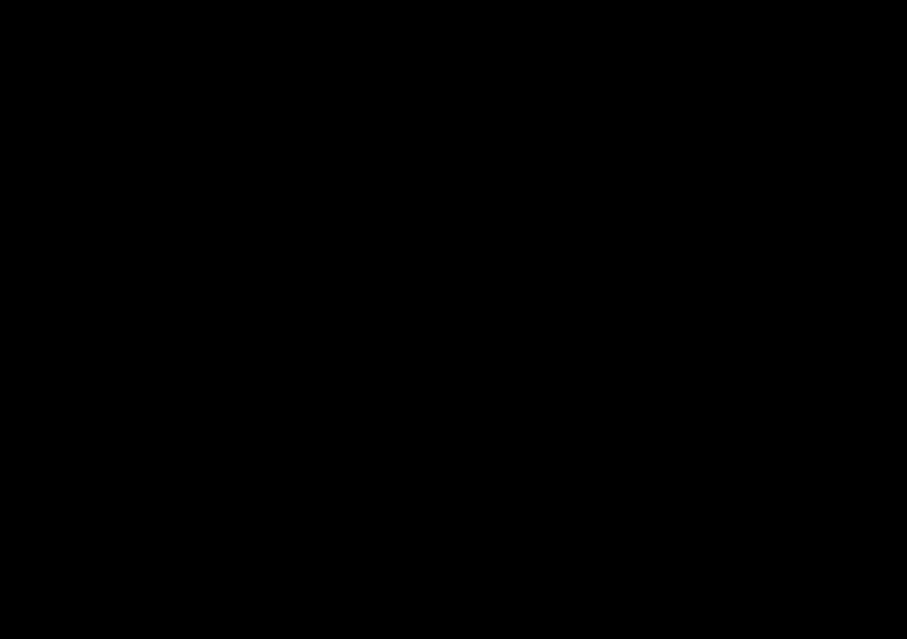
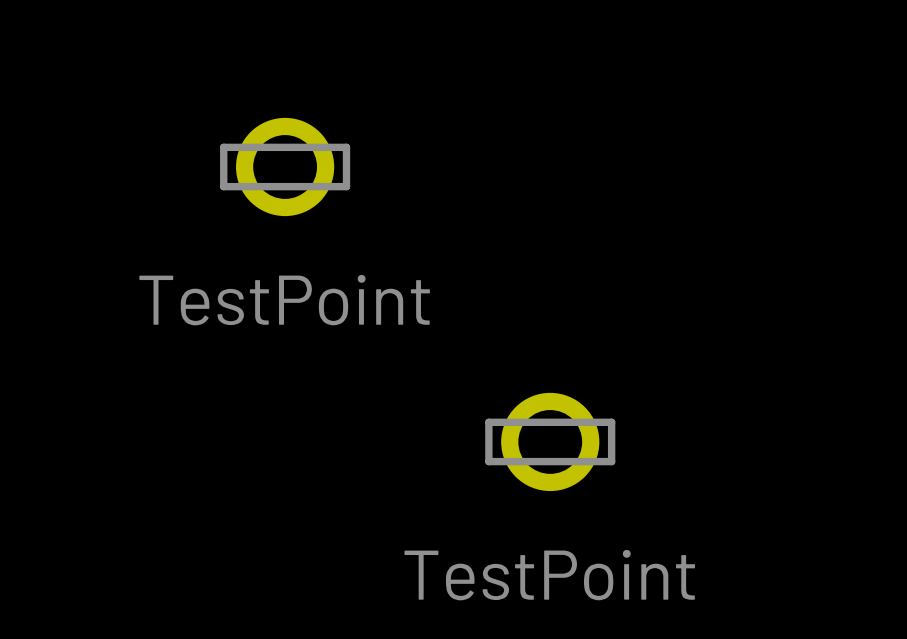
part: none -> TestPoint (285, 166)
part: none -> TestPoint (550, 441)

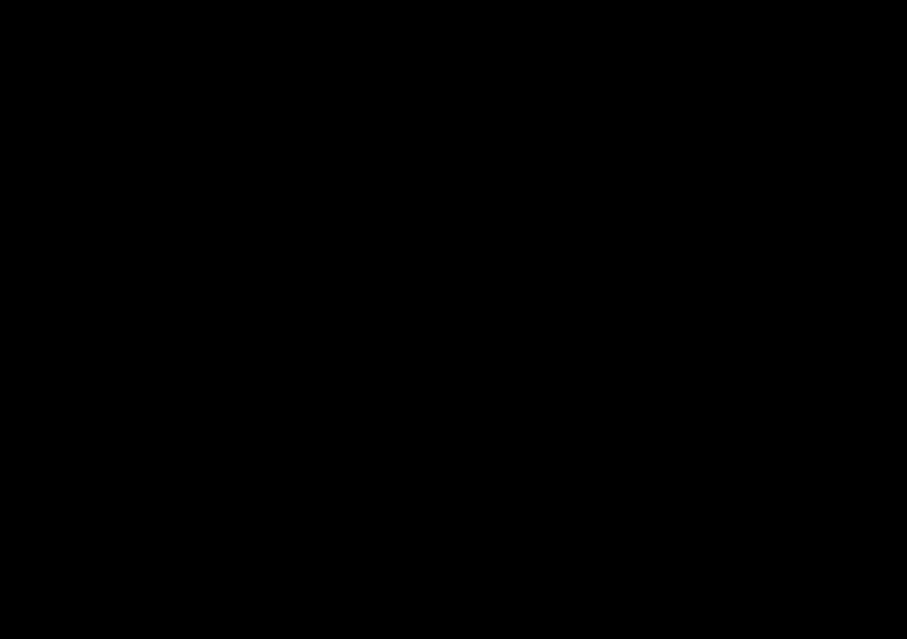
part: TestPoint (285, 166) -> none
part: TestPoint (550, 441) -> none

